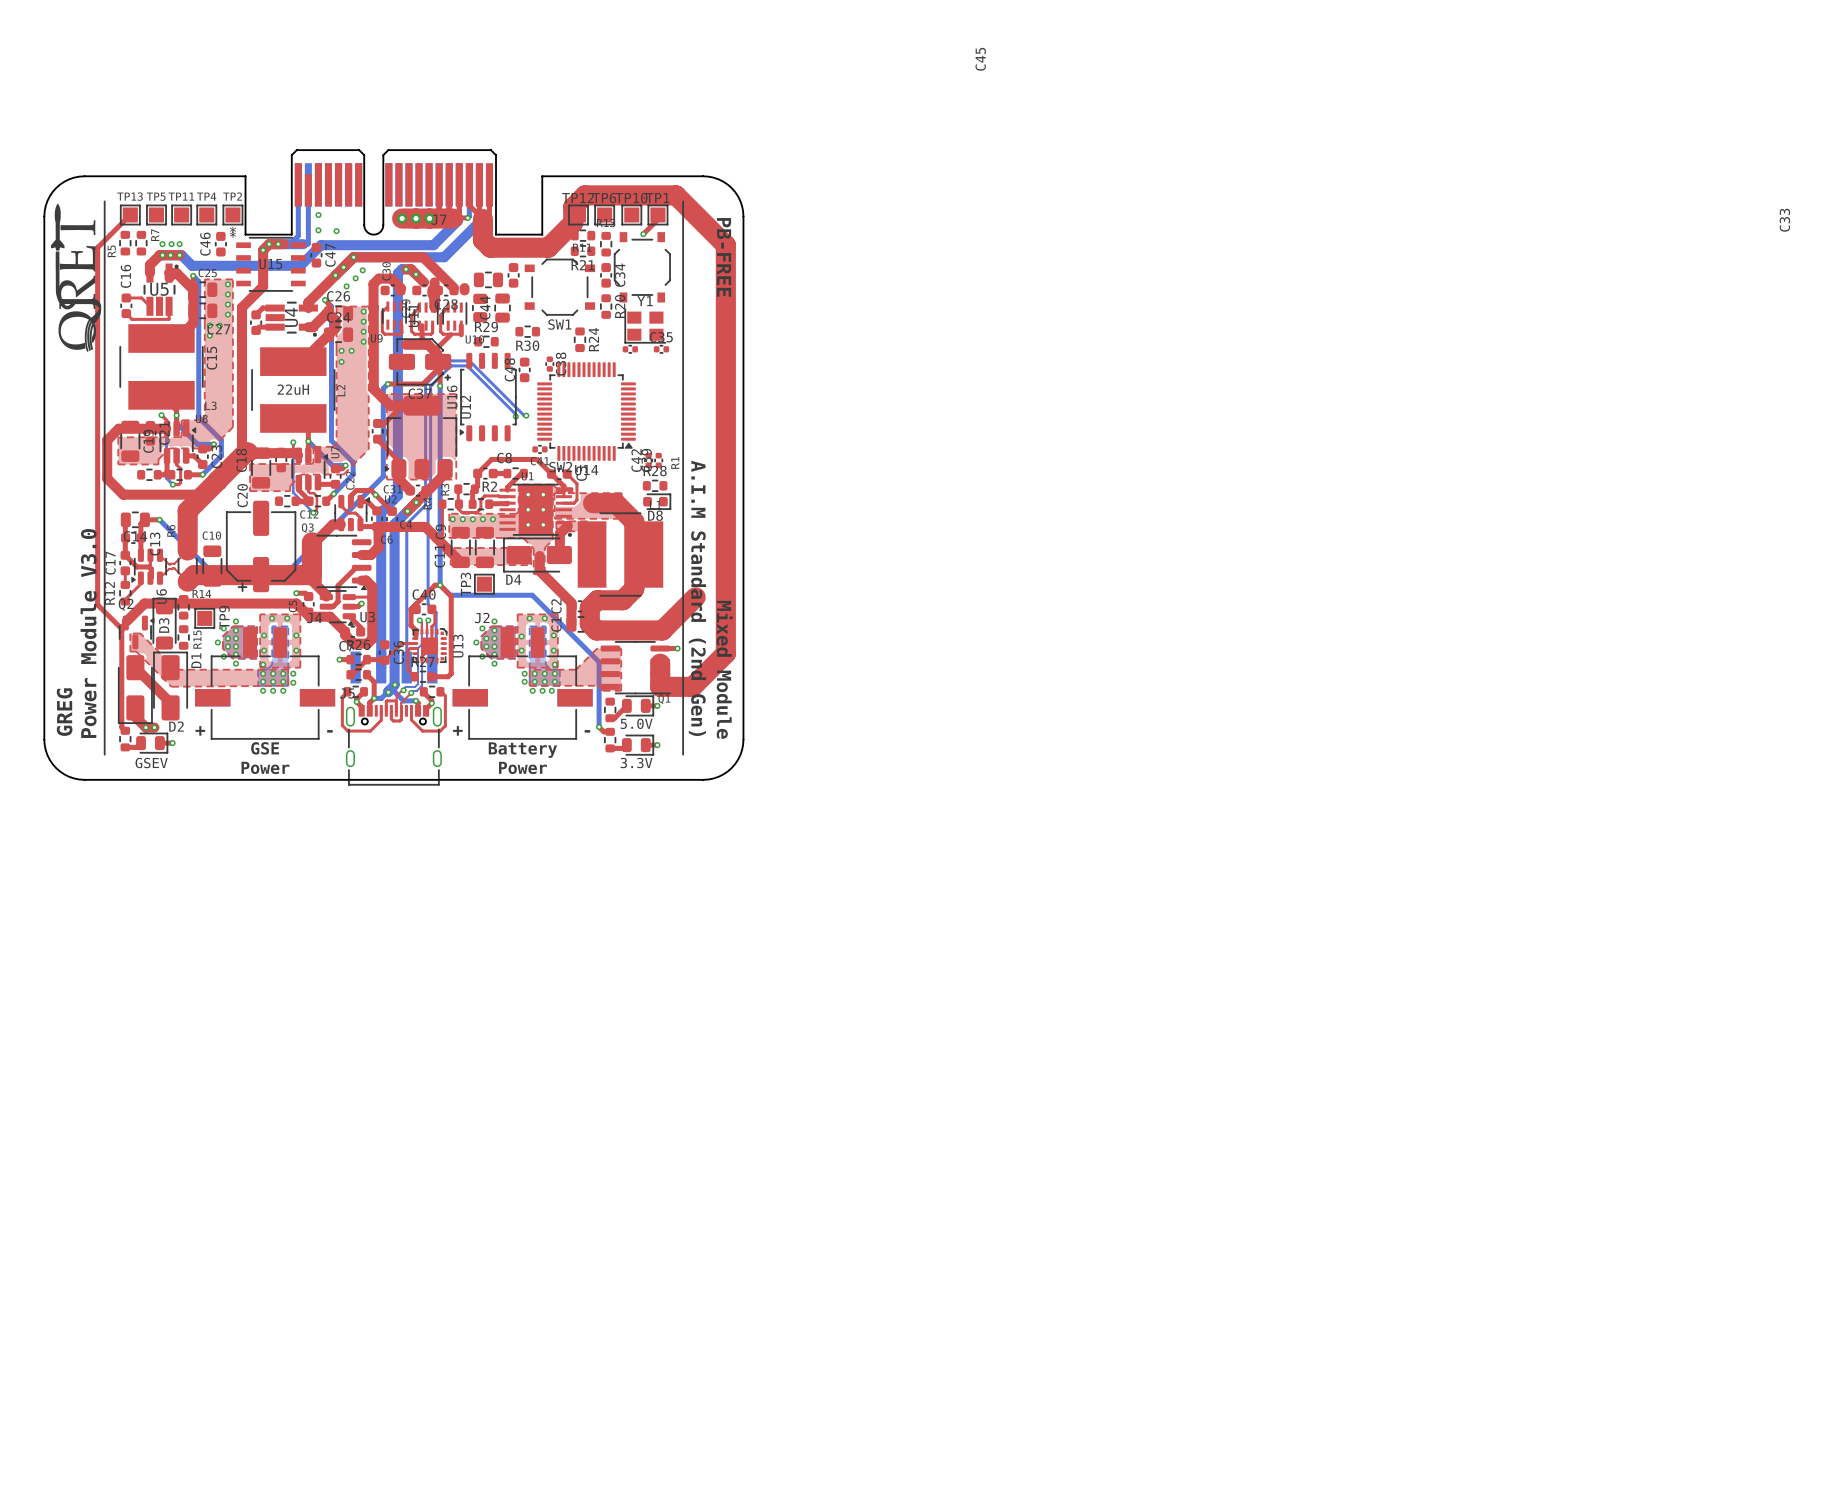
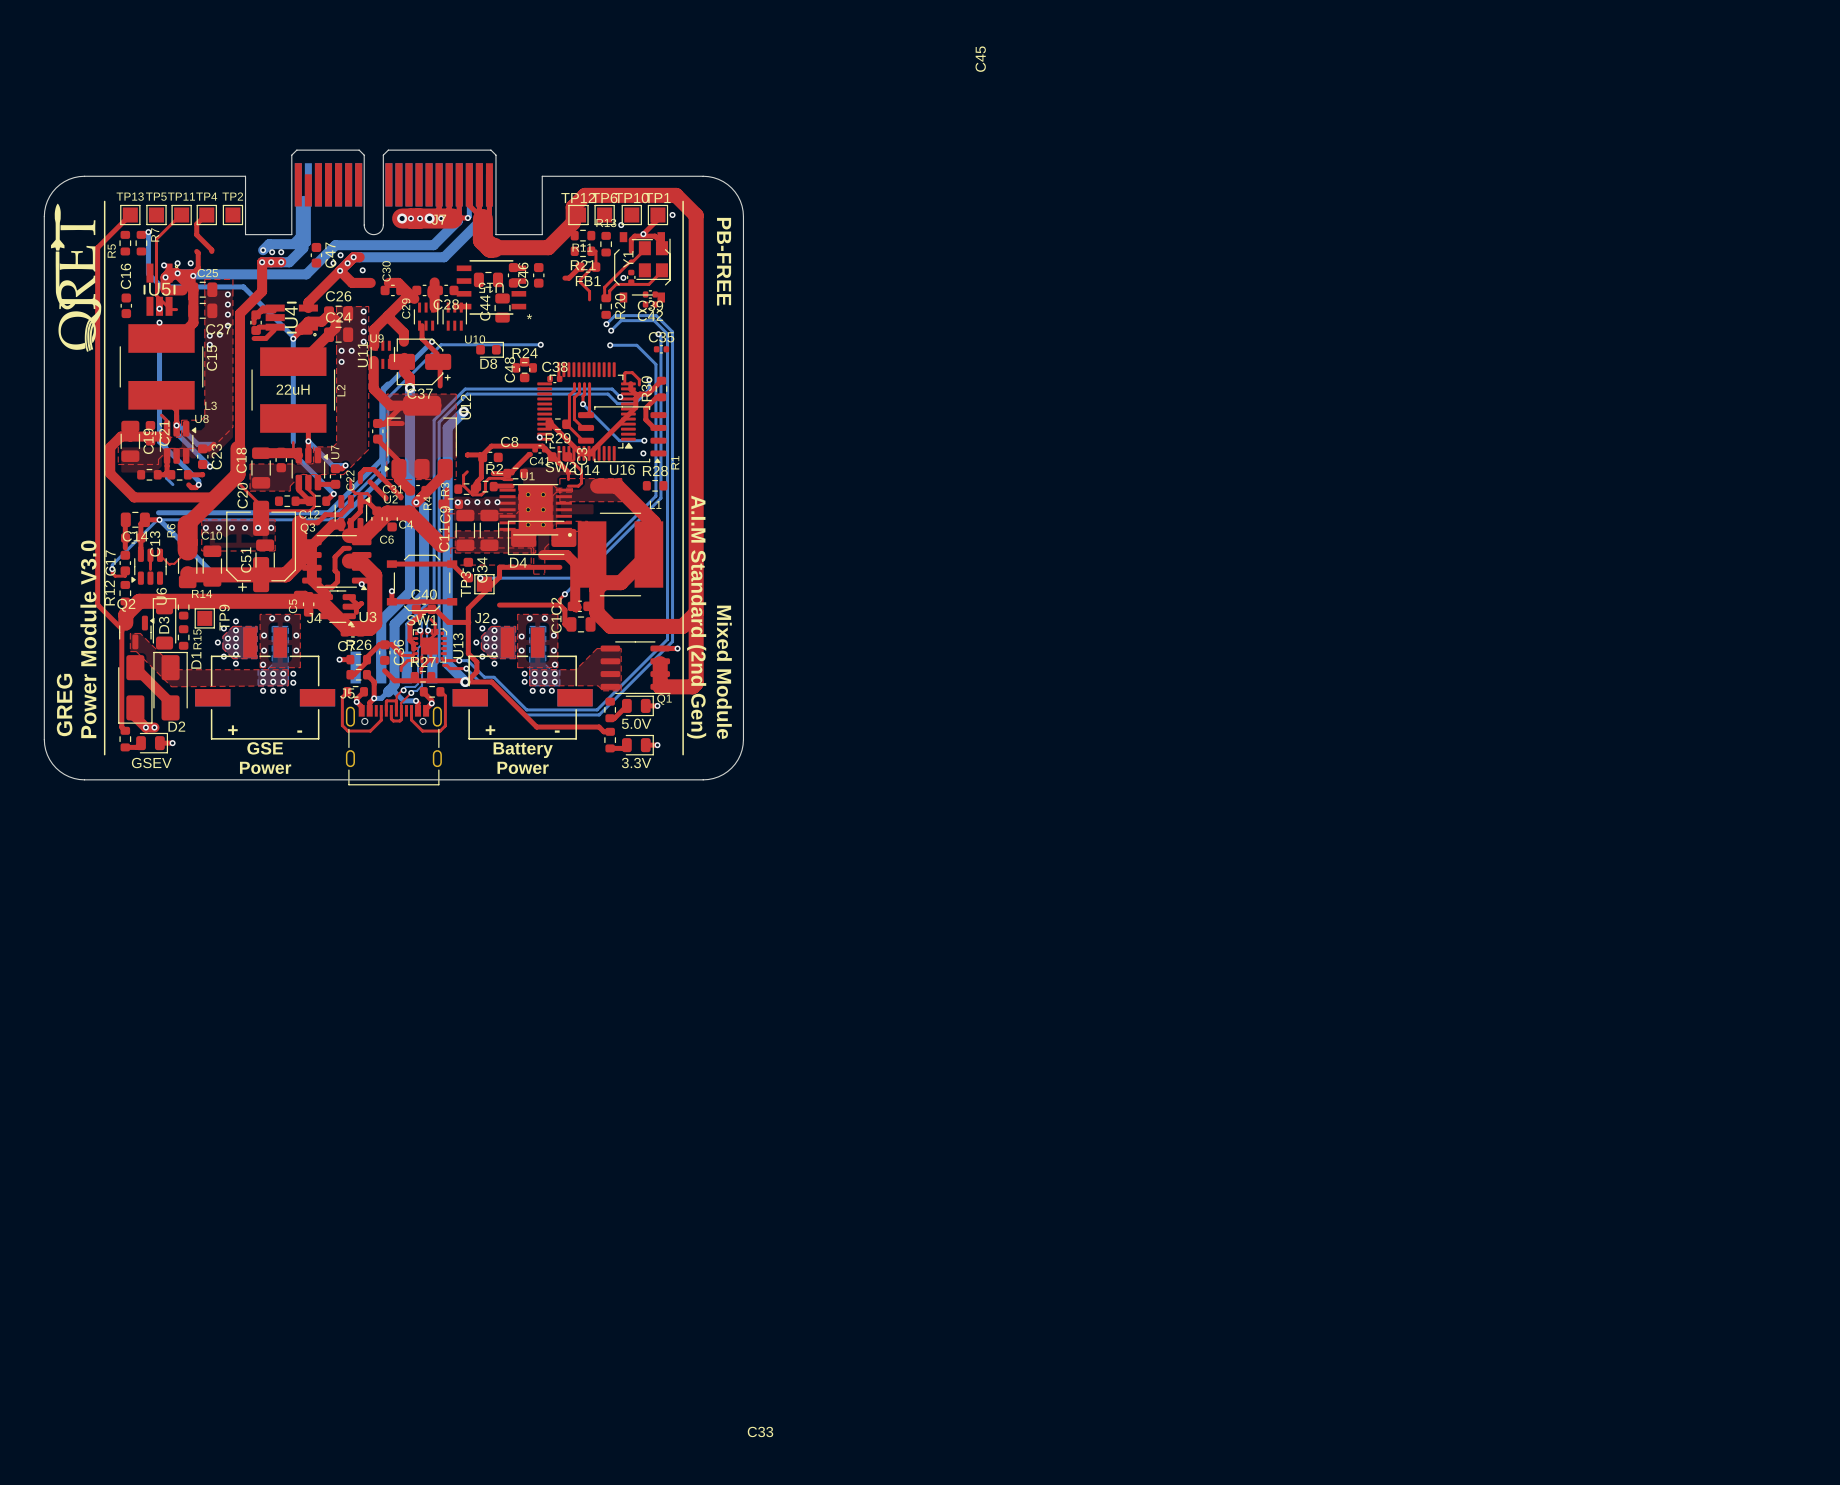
bottom track: none -> (308, 195) (303, 200) (303, 248) (289, 262) (262, 262)
top track: none -> (180, 215) (156, 239) (156, 295) (170, 309) (176, 309)
top track: none -> (205, 215) (196, 224) (196, 234) (211, 251)
via: (318, 215) -> none
via: none -> (672, 215)
top track: (696, 215) (725, 245) (725, 653) (696, 683) -> (696, 215) (696, 683)
top track width: thick (696, 215) (676, 195) (585, 195) (573, 207) (573, 222) (548, 247) (494, 247) -> thin (696, 215) (676, 195) (585, 195) (573, 207) (573, 222) (548, 247) (494, 247)
via: none -> (410, 218)
via: (416, 218) -> none
via: none -> (420, 218)
via: none -> (441, 218)
via: none -> (621, 225)
via: (318, 230) -> none
via: (336, 231) -> none
bottom track: none -> (148, 232) (148, 273) (161, 286) (243, 286) (293, 336) (293, 442)
via: none -> (148, 232)
via: (162, 244) -> none
via: (171, 244) -> none
via: (179, 244) -> none
C46 position: (220, 244) -> (538, 275)
via: (269, 244) -> none
via: (278, 244) -> none
top track: (283, 244) (269, 244) (263, 250) (263, 286) (241, 307) (241, 446) (248, 452) (187, 510) (187, 524) -> (237, 474) (187, 524)
bottom track: (335, 245) (321, 245) (300, 265) (192, 265) (181, 255) (161, 255) -> (335, 245) (306, 274) (168, 274) (165, 277)
top track: none -> (644, 248) (604, 287) (604, 299)
top track: none -> (661, 248) (661, 243) (654, 236) (634, 236) (631, 239) (631, 251)
top track: none -> (196, 251) (198, 267) (191, 274) (168, 274) (165, 277) (166, 290) (182, 290)
top track: none -> (595, 251) (595, 264) (580, 279) (589, 291) (589, 299)
via: none -> (272, 252)
via: none -> (281, 252)
via: (162, 255) -> none
via: (170, 255) -> none
top track: (179, 255) (159, 255) (149, 265) (149, 273) -> none
via: (179, 255) -> none
via: none -> (340, 255)
top track: (359, 257) (423, 257) (454, 288) -> none
via: none -> (262, 262)
via: none -> (271, 262)
top track: none -> (281, 262) (262, 262) (262, 291) (239, 313) (239, 446) (237, 448) (237, 474)
via: none -> (281, 262)
via: none -> (177, 263)
via: none -> (190, 263)
via: none -> (333, 263)
via: none -> (347, 263)
U15 rotation: 0° (270, 264) -> 180° (491, 287)
U15 position: (270, 264) -> (491, 287)
via: none -> (164, 265)
via: (343, 267) -> none
top track: none -> (580, 267) (569, 278) (564, 278)
FB1: none -> (588, 267)
top track: (405, 269) (410, 269) (424, 282) -> none
via: (405, 269) -> none
top track: none -> (340, 270) (352, 282) (370, 282)
via: none -> (340, 270)
top track: none -> (661, 270) (648, 284) (616, 284) (609, 290) (609, 299)
via: none -> (177, 273)
bottom track: (416, 274) (410, 269) (401, 269) (397, 273) (397, 495) (381, 512) (381, 620) -> (409, 388) (409, 591) (381, 620)
via: (416, 274) -> none
bottom track: (193, 275) (198, 281) (198, 417) (221, 440) (221, 455) (202, 474) -> none
via: (335, 275) -> none
C34 position: (606, 275) -> (468, 570)
via: none -> (165, 277)
via: none -> (623, 277)
via: (355, 278) -> none
top track: none -> (388, 282) (398, 282) (414, 298)
via: (227, 284) -> none
via: (346, 286) -> none
SW1 position: (559, 287) -> (422, 582)
top track: (464, 288) (464, 290) -> none
top track: (400, 290) (400, 288) (391, 278) (378, 278) (373, 284) (373, 360) -> none
top track: (126, 298) (141, 298) (149, 306) -> none
top track: none -> (413, 298) (405, 298) (374, 329) (374, 345)
top track: (325, 300) (329, 304) (329, 313) (326, 313) (312, 327) (308, 327) -> none
bottom track: (325, 300) (331, 306) (331, 440) (353, 462) (353, 474) (333, 493) -> none
via: (325, 300) -> none
top track: (169, 306) (168, 319) (132, 319) (126, 313) -> none
top track: (386, 307) (382, 312) (382, 331) (384, 334) (400, 334) (401, 325) -> none
top track: (419, 307) (411, 315) (411, 331) (414, 334) (431, 334) (432, 325) -> none
top track: (448, 307) (440, 315) (440, 331) (443, 334) (459, 334) (461, 325) (461, 334) -> none
via: none -> (159, 308)
part: (480, 308) -> none
top track: none -> (274, 311) (261, 311) (254, 318) (254, 322)
top track: none -> (387, 315) (403, 332) (403, 341)
U11 rotation: 0° (394, 315) -> 180° (382, 354)
U11 position: (394, 315) -> (382, 354)
top track: none -> (327, 316) (321, 321) (308, 321) (300, 330)
bottom track: none -> (159, 322) (159, 441) (198, 481) (198, 484)
via: none -> (159, 322)
bottom track: none -> (606, 324) (615, 315) (656, 315) (672, 331) (672, 641) (599, 714) (524, 714) (491, 682) (480, 682) (466, 668)
via: none -> (606, 324)
via: (209, 325) -> none
via: (219, 325) -> none
via: none -> (227, 325)
Y1 rotation: 0° (645, 326) -> 90° counterclockwise (653, 259)
Y1 position: (645, 326) -> (653, 259)
R29 name position: R29 (486, 327) -> R29 (558, 438)
top track: none -> (274, 330) (265, 338) (254, 338)
bottom track: none -> (611, 330) (621, 320) (654, 320) (667, 334) (667, 639) (597, 709) (526, 709) (494, 677) (484, 677) (467, 660) (459, 660)
via: none -> (611, 330)
R30 rotation: 0° (527, 331) -> 90° clockwise (661, 389)
R30 position: (527, 331) -> (661, 389)
top track: none -> (310, 332) (299, 332) (293, 338)
via: none -> (219, 334)
top track: (450, 334) (437, 348) (437, 353) -> none
bottom track: none -> (658, 334) (660, 336) (660, 498) (564, 594)
via: none -> (658, 334)
via: none -> (293, 338)
R24 rotation: 0° (579, 339) -> 90° clockwise (524, 367)
R24 position: (579, 339) -> (524, 367)
R24 name position: R24 (593, 339) -> R24 (525, 353)
bottom track: none -> (432, 341) (381, 392) (381, 459) (328, 512) (158, 512)
via: none -> (432, 341)
R29 position: (486, 341) -> (557, 424)
via: none -> (209, 344)
top track: (405, 344) (428, 344) (437, 353) -> none
bottom track: none -> (540, 344) (441, 344) (387, 398) (387, 461) (330, 519) (157, 519) (112, 565) (112, 569)
via: none -> (540, 344)
bottom track: none -> (610, 345) (636, 345) (655, 364) (655, 496) (573, 578) (480, 578)
via: none -> (610, 345)
C33 rotation: 0° (630, 349) -> 90° clockwise (631, 277)
C33 position: (630, 349) -> (631, 277)
top track: (437, 353) (437, 369) (423, 384) (387, 384) -> none
top track: none -> (404, 357) (404, 372) (409, 377) (409, 388)
C38 rotation: 0° (549, 364) -> 90° clockwise (554, 378)
C38 position: (549, 364) -> (554, 378)
via: none -> (649, 379)
top track: none -> (661, 380) (648, 394) (639, 394) (635, 398) (635, 407) (589, 453) (580, 453) (549, 424)
top track: none -> (574, 383) (574, 390) (569, 395) (569, 427) (583, 440) (586, 440)
top track: none -> (579, 383) (579, 392) (574, 397) (574, 419) (583, 427) (586, 427)
top track: none -> (584, 383) (583, 404)
top track: none -> (589, 383) (589, 411) (586, 415)
top track: none -> (624, 383) (624, 373) (632, 372) (639, 379) (639, 385)
top track: none -> (630, 383) (630, 389) (636, 394) (639, 394)
via: (387, 384) -> none
bottom track: (440, 386) (440, 585) (450, 595) (532, 595) (599, 662) (599, 727) -> none
via: (440, 386) -> none
via: none -> (409, 388)
U16 rotation: 0° (488, 397) -> 90° counterclockwise (622, 434)
U16 position: (488, 397) -> (622, 434)
via: none -> (620, 397)
top track: none -> (661, 397) (656, 397) (645, 408) (645, 419) (654, 427) (658, 427)
bottom track: none -> (583, 404) (619, 440) (644, 440)
via: none -> (583, 404)
bottom track: none -> (463, 411) (447, 427) (447, 664) (465, 681)
via: none -> (463, 411)
via: (161, 415) -> none
via: (176, 415) -> none
bottom track: (526, 415) (469, 360) (448, 360) (425, 384) (425, 505) (406, 524) (406, 624) -> (620, 397) (612, 389) (465, 389) (434, 420) (434, 596) (406, 624)
via: (526, 415) -> none
bottom track: (515, 416) (467, 365) (451, 365) (430, 386) (428, 604) (436, 612) (436, 663) -> (649, 379) (649, 389) (634, 403) (617, 403) (607, 394) (467, 394) (439, 422) (439, 660) (436, 663)
via: (515, 416) -> none
top track: none -> (377, 423) (402, 423)
bottom track: none -> (176, 425) (176, 433) (209, 466)
via: none -> (176, 425)
top track: (166, 428) (118, 428) (107, 440) (107, 478) (123, 494) (203, 494) -> none
via: none -> (539, 437)
top track: none -> (166, 438) (164, 436) (121, 436) (110, 447) (110, 473) (134, 497) (213, 497)
via: none -> (644, 440)
via: (293, 442) -> none
via: (213, 444) -> none
bottom track: (293, 453) (293, 492) (313, 512) -> (293, 453) (333, 493)
via: none -> (643, 453)
top track: none -> (530, 454) (512, 473)
top track: (176, 455) (176, 464) (180, 468) (180, 482) (172, 484) -> none
top track: (186, 455) (194, 455) (202, 464) -> none
top track: none -> (467, 455) (480, 454) (482, 457)
top track: none -> (567, 456) (581, 470) (581, 483) (578, 486) (568, 486)
C42 rotation: 0° (648, 460) -> 90° clockwise (650, 304)
C42 position: (648, 460) -> (650, 304)
C39 rotation: 0° (658, 460) -> 90° clockwise (650, 294)
C39 position: (658, 460) -> (650, 294)
via: none -> (210, 466)
top track: none -> (467, 471) (463, 475) (463, 485) (472, 494) (481, 494) (485, 490) (485, 482) (489, 478) (512, 479)
C8 position: (485, 473) -> (490, 457)
top track: (523, 473) (521, 473) (507, 487) (507, 490) -> none
via: (202, 474) -> none
C3 position: (559, 474) -> (559, 456)
top track: (567, 474) (576, 483) (576, 500) (573, 503) (563, 503) -> none
top zone outline: none -> (559, 478) (621, 478) (621, 501) (559, 501) (559, 478)
top track: none -> (350, 479) (350, 488) (355, 493) (367, 493) (369, 496) (369, 502)
top track: none -> (568, 479) (568, 472) (542, 446) (491, 446) (481, 456) (481, 477) (477, 481) (477, 487)
top track: none -> (360, 481) (360, 473) (364, 469) (373, 469) (400, 497)
top track: none -> (369, 481) (385, 498)
via: (172, 484) -> none
top track: none -> (188, 484) (191, 487) (195, 487) (198, 484)
via: none -> (198, 484)
top track: none -> (512, 486) (493, 487)
top track: none -> (597, 486) (616, 486) (653, 522) (653, 549) (620, 582) (603, 582) (596, 589) (596, 612) (610, 626) (682, 626) (696, 612)
top track: (308, 489) (310, 493) (313, 493) (316, 496) (316, 509) (313, 512) -> (308, 489) (314, 495) (314, 506) (310, 510) (266, 510) (237, 482) (237, 474)
top track: none -> (446, 489) (446, 539) (441, 545) (409, 513) (387, 513) (364, 535) (349, 535)
top track: (458, 489) (458, 508) (462, 512) (476, 512) (480, 508) (480, 499) (484, 495) (507, 496) -> none
top zone outline: (554, 493) (621, 493) (622, 518) (554, 518) (554, 493) -> none
via: (375, 494) -> none
top track: (563, 496) (563, 486) (536, 459) (491, 459) (477, 473) (477, 486) (472, 491) (472, 504) -> none
top track: (341, 501) (341, 505) (348, 513) (355, 513) (360, 517) (360, 524) (362, 526) (377, 526) -> none
top track: (350, 501) (350, 495) (356, 490) (371, 490) (392, 511) -> none
D8 position: (657, 501) -> (490, 349)
top track: (416, 502) (407, 511) -> none
bottom track: (416, 502) (394, 524) (394, 624) -> (423, 506) (424, 594) (394, 624)
via: none -> (457, 502)
via: none -> (467, 502)
via: none -> (477, 502)
via: none -> (487, 502)
via: none -> (497, 502)
top track: (507, 503) (489, 504) -> none
top track: (593, 503) (615, 503) (634, 521) (634, 588) (622, 600) (597, 600) (589, 607) (589, 623) (596, 630) (662, 630) (695, 597) -> none
top track: none -> (350, 504) (340, 514) (325, 514) (317, 522) (299, 522) (299, 561) (285, 574) (187, 573)
top track: none -> (360, 504) (360, 511) (349, 522)
top track: (442, 504) (442, 543) (451, 553) -> none
R2 position: (480, 504) -> (485, 486)
via: (407, 511) -> none
via: (313, 512) -> none
top zone outline: none -> (201, 519) (275, 519) (275, 550) (201, 550) (201, 519)
via: (452, 519) -> none
via: (462, 519) -> none
via: (472, 519) -> none
via: (482, 519) -> none
via: (492, 519) -> none
top track: (567, 525) (559, 533) (559, 555) -> none
via: none -> (205, 527)
via: none -> (218, 527)
via: none -> (231, 527)
via: none -> (245, 527)
via: none -> (258, 527)
via: none -> (271, 527)
top zone outline: none -> (455, 530) (535, 530) (535, 553) (455, 553) (455, 530)
top track: (311, 542) (311, 575) (194, 575) (187, 581) (172, 568) (169, 568) (160, 578) -> none
top track: (125, 547) (125, 555) (137, 566) (149, 566) (151, 569) (150, 578) (150, 569) -> none
C9 position: (460, 547) -> (465, 530)
C11 position: (484, 547) -> (489, 530)
top track: none -> (349, 548) (343, 548) (335, 557) (337, 581) (332, 587) (326, 587)
top track: (361, 555) (370, 555) (378, 547) (378, 528) (376, 526) (425, 526) (460, 562) -> none
D4 position: (537, 555) -> (542, 537)
top track: none -> (543, 555) (566, 555) (575, 563) (575, 607)
top track: (539, 556) (539, 571) (571, 602) (571, 624) -> none
C51: none -> (265, 560)
top track: none -> (349, 561) (360, 561) (374, 575) (374, 623) (369, 628) (347, 628) (320, 601) (139, 601) (125, 614) (125, 623)
top track: none -> (391, 564) (452, 564) (467, 577)
top track: (361, 567) (355, 567) (338, 585) (338, 601) (333, 606) (326, 606) -> none
top track: none -> (559, 567) (499, 567) (499, 577) (468, 608) (468, 653) (476, 662) (476, 671) (466, 681)
via: none -> (112, 569)
top track: (142, 575) (141, 583) (125, 599) -> none
top track: (125, 576) (125, 582) -> (125, 576) (115, 576) (112, 573) (112, 569)
via: none -> (480, 578)
top track: (361, 580) (366, 580) (372, 586) (372, 639) (367, 643) (353, 643) (330, 616) (309, 616) (296, 603) (144, 603) (126, 621) -> none
via: none -> (361, 584)
via: (440, 585) -> none
top track: none -> (391, 591) (391, 601) (452, 601)
via: none -> (391, 591)
via: (296, 593) -> none
top track: none -> (564, 594) (559, 599) (559, 605)
via: none -> (564, 594)
top track: (349, 597) (372, 597) -> (349, 596) (356, 603) (356, 612)
via: (361, 603) -> none
top track: none -> (499, 605) (559, 605)
top track: none -> (559, 605) (564, 610) (564, 624) (567, 627)
top track: (431, 609) (434, 612) (434, 623) (431, 626) (431, 646) (422, 656) -> none
top track: (349, 616) (360, 627) (360, 631) -> none
top track: none -> (430, 619) (435, 623) (435, 634) (430, 638) (430, 658) (420, 668) (420, 672)
top track: (419, 620) (421, 622) (421, 631) -> none
via: (419, 620) -> none
top track: (428, 620) (426, 633) -> none
via: (428, 620) -> none
top track: none -> (468, 622) (448, 622) (436, 610) (425, 610) (409, 624) (409, 640) (413, 643) (413, 649)
top track: none -> (420, 630) (420, 645)
via: none -> (420, 630)
via: none -> (428, 630)
top track: (416, 636) (416, 630) (410, 625) (410, 609) (435, 585) (440, 585) (451, 596) (451, 673) (448, 676) (431, 676) -> none
top track: (414, 643) (401, 643) (384, 660) (366, 659) (351, 674) -> (401, 654) (391, 644) (379, 644) (366, 657) (366, 661) (351, 674)
top track: (417, 648) (409, 648) (407, 650) (407, 669) (414, 676) -> none
top track: none -> (400, 654) (413, 655)
top track: none -> (413, 660) (407, 660) (401, 667) (401, 670)
top track: none -> (443, 660) (459, 660)
via: none -> (459, 660)
top track width: thick (660, 663) (660, 686) (692, 686) (696, 683) -> thin (660, 663) (660, 686) (692, 686) (696, 683)
top track: none -> (443, 665) (450, 668) (466, 668)
via: none -> (466, 668)
top track: none -> (384, 670) (394, 680) (491, 681) (536, 727) (599, 727)
via: none -> (465, 681)
via: (394, 684) -> none
via: (388, 692) -> none
via: (599, 727) -> none

